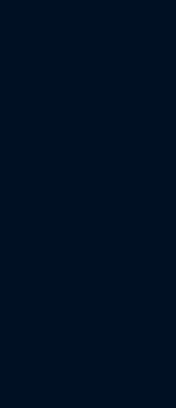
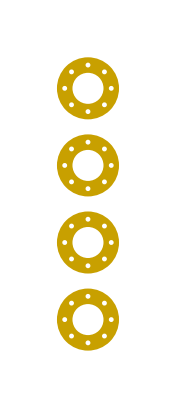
part: none -> (87, 88)
part: none -> (87, 165)
part: none -> (87, 242)
part: none -> (87, 319)

